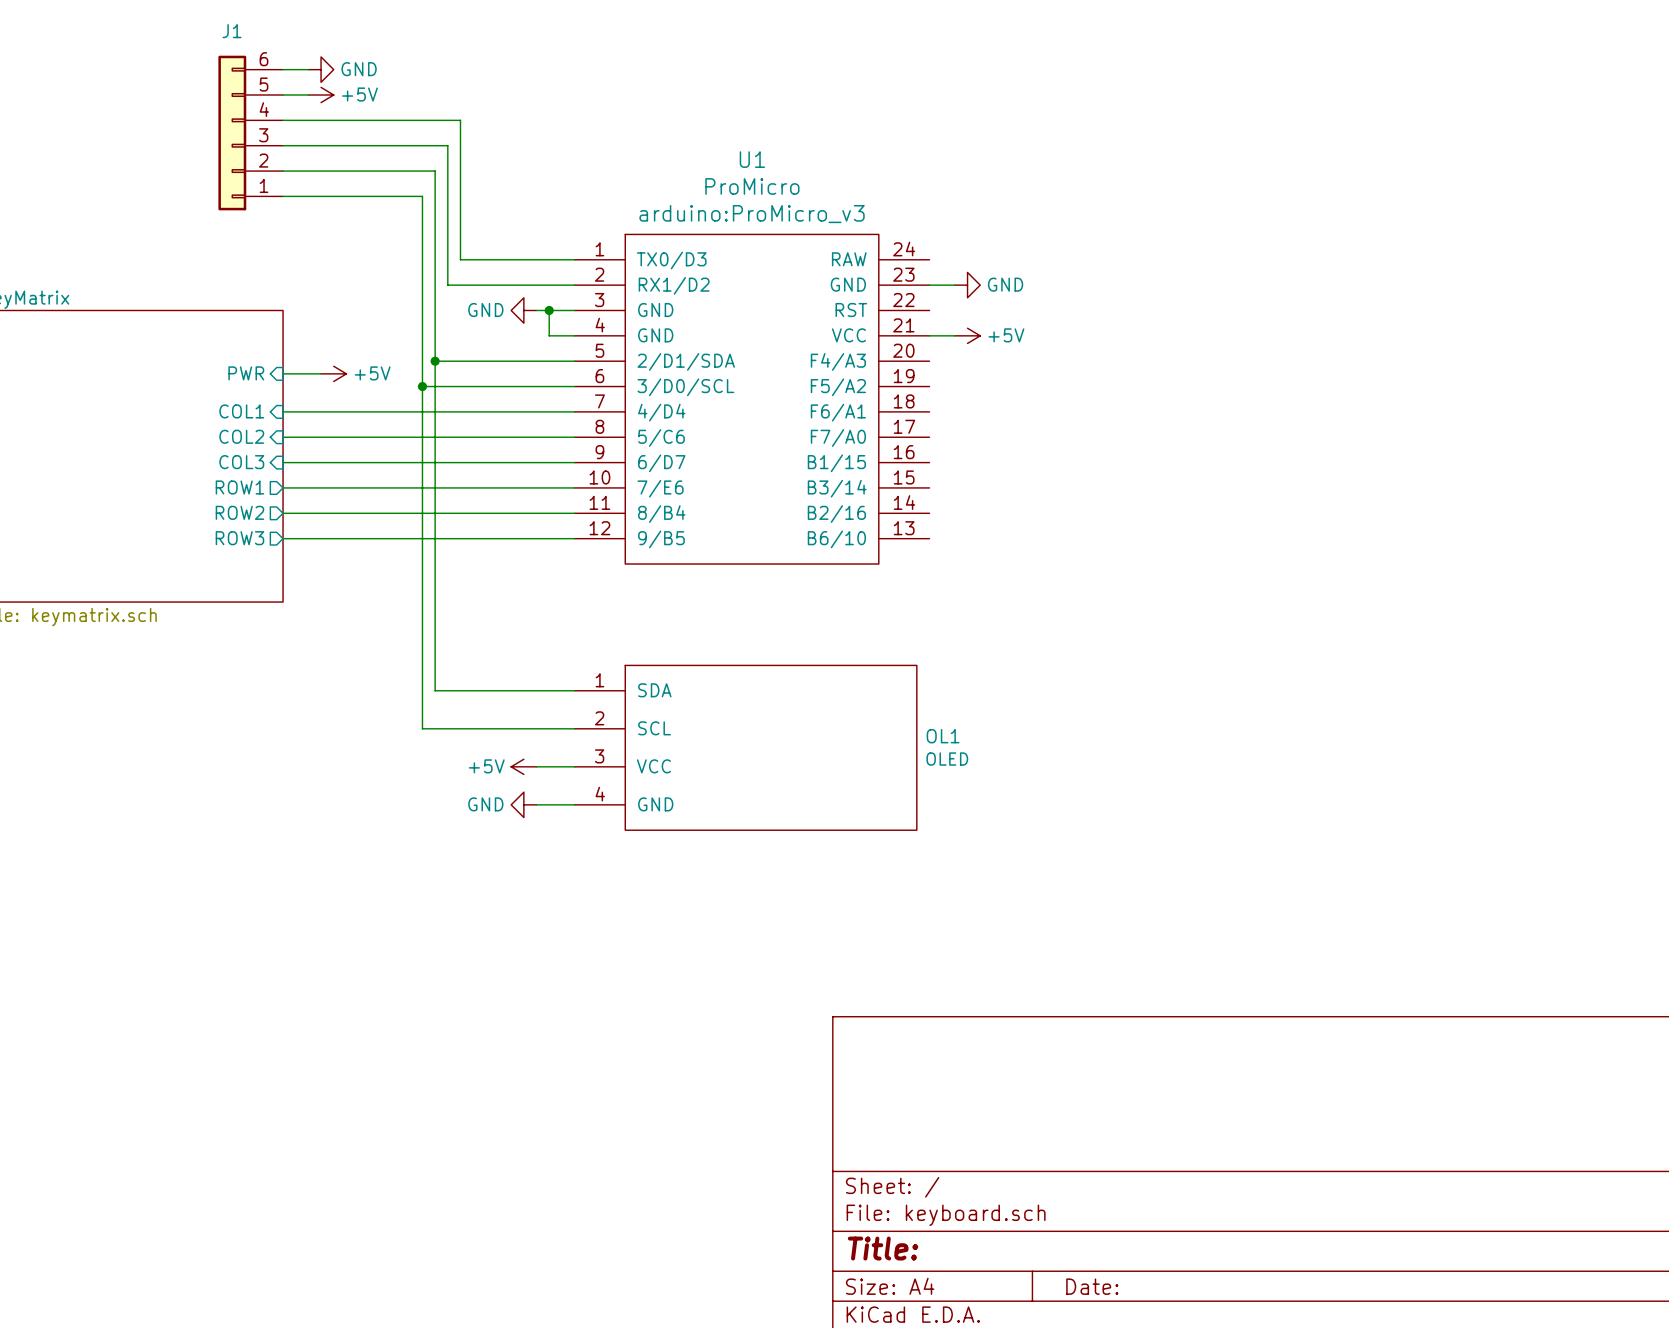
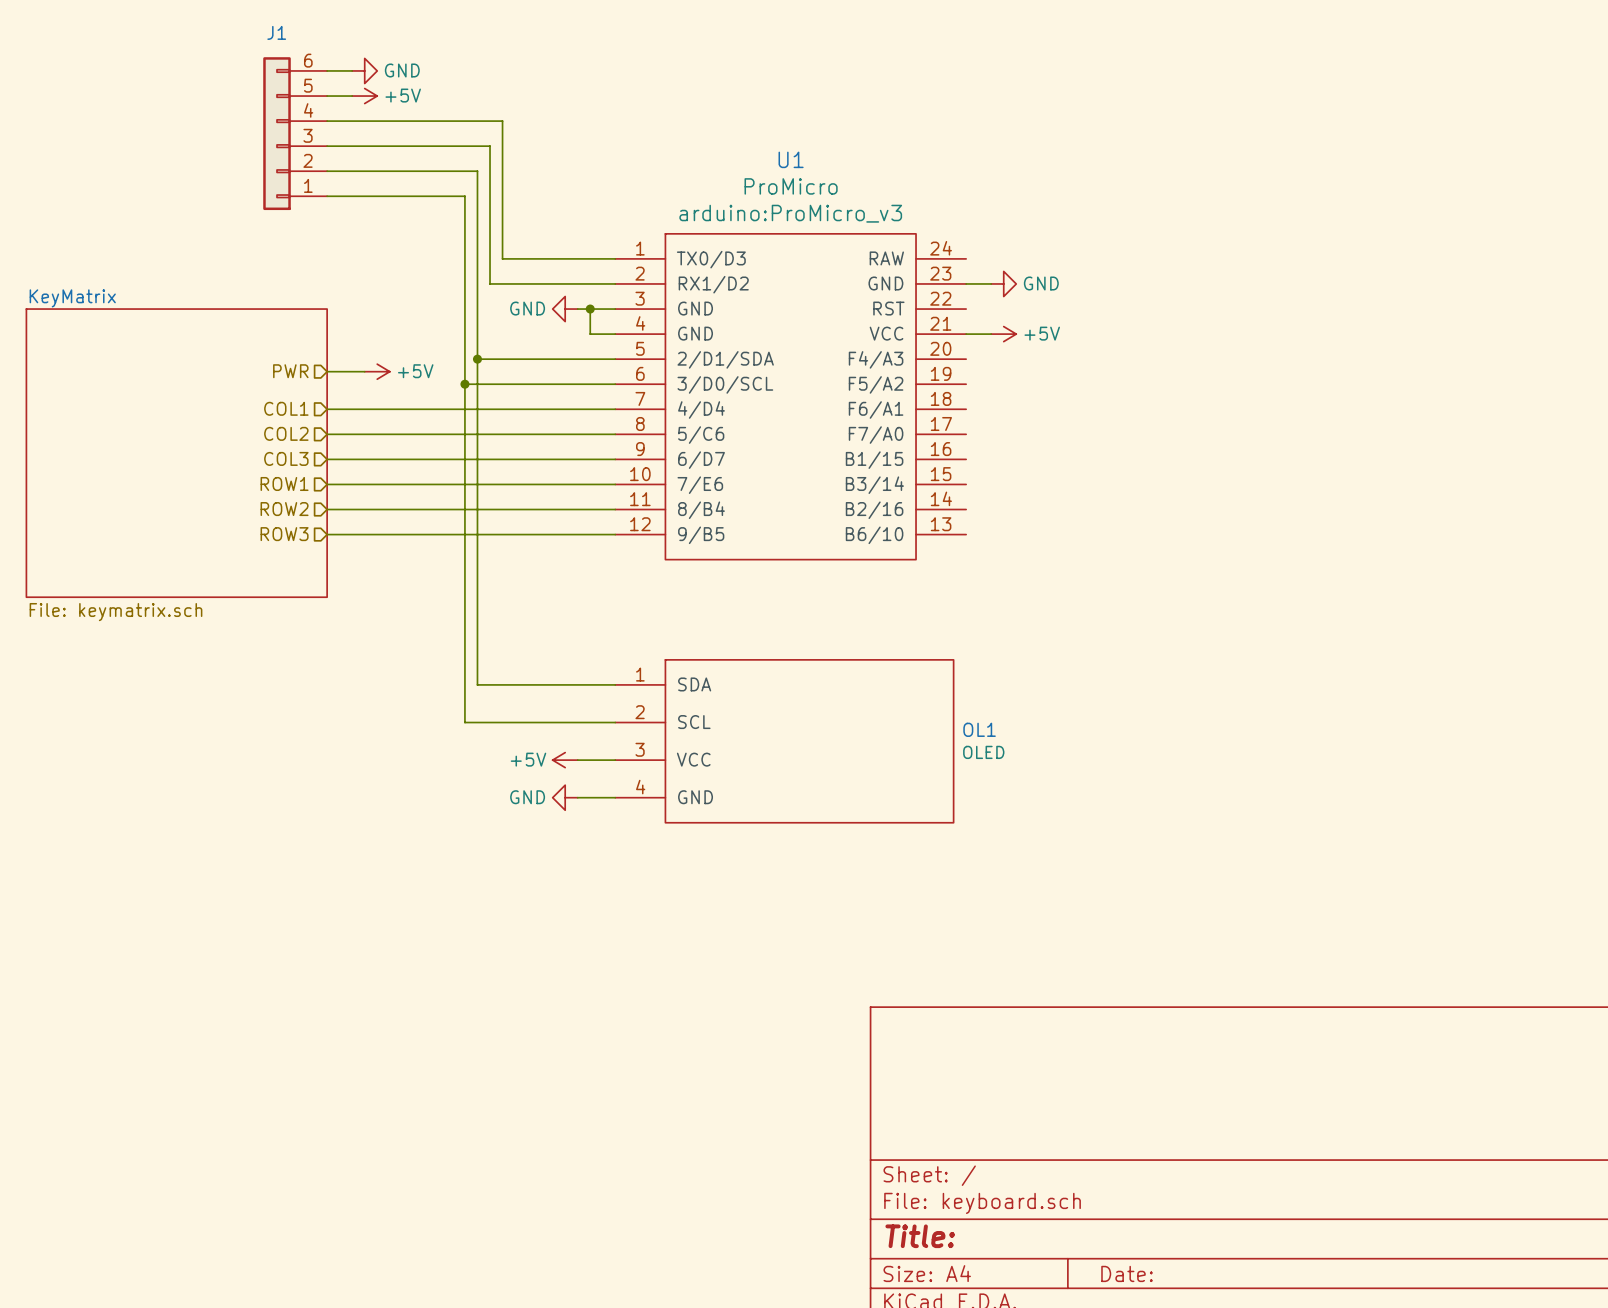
sheet pin: PWR (246, 373) -> none
hierarchical label: none -> PWR (290, 371)
sheet pin: COL1 (241, 411) -> none
hierarchical label: none -> COL1 (286, 408)
sheet pin: COL2 (241, 436) -> none
hierarchical label: none -> COL2 (286, 433)
sheet pin: COL3 (241, 462) -> none
hierarchical label: none -> COL3 (286, 458)
sheet pin: ROW1 (239, 487) -> none
hierarchical label: none -> ROW1 (284, 483)
sheet pin: ROW2 (239, 512) -> none
hierarchical label: none -> ROW2 (284, 509)
sheet pin: ROW3 (239, 538) -> none
hierarchical label: none -> ROW3 (284, 534)

